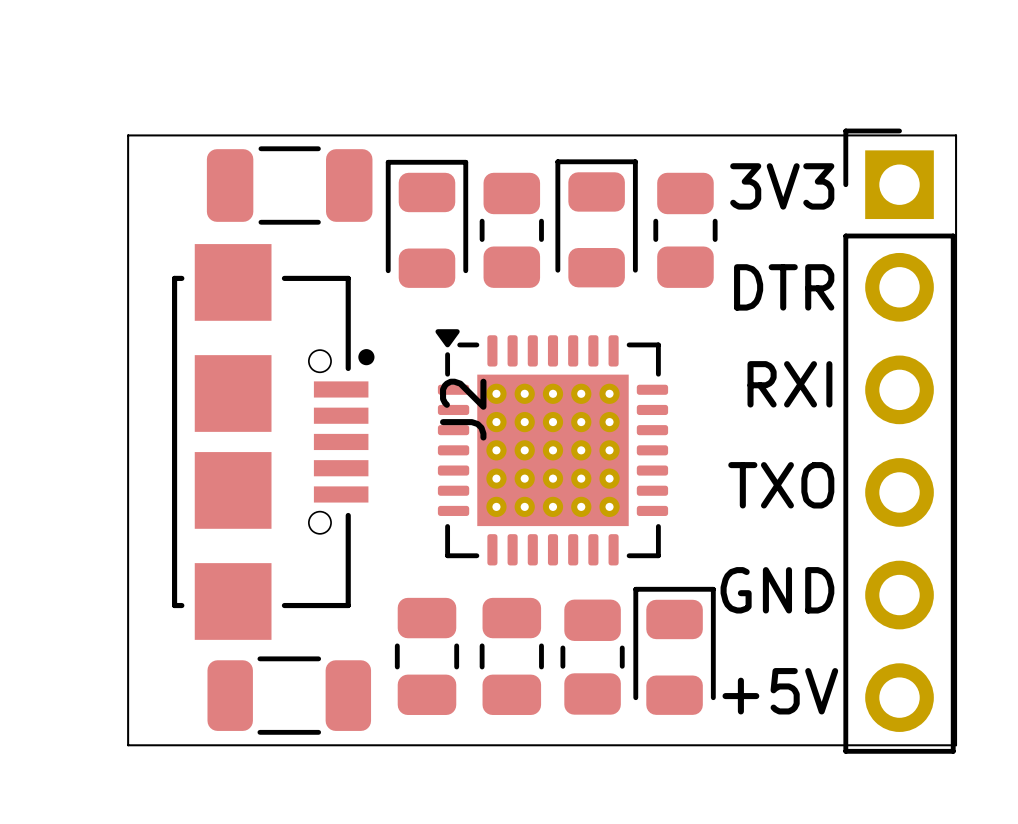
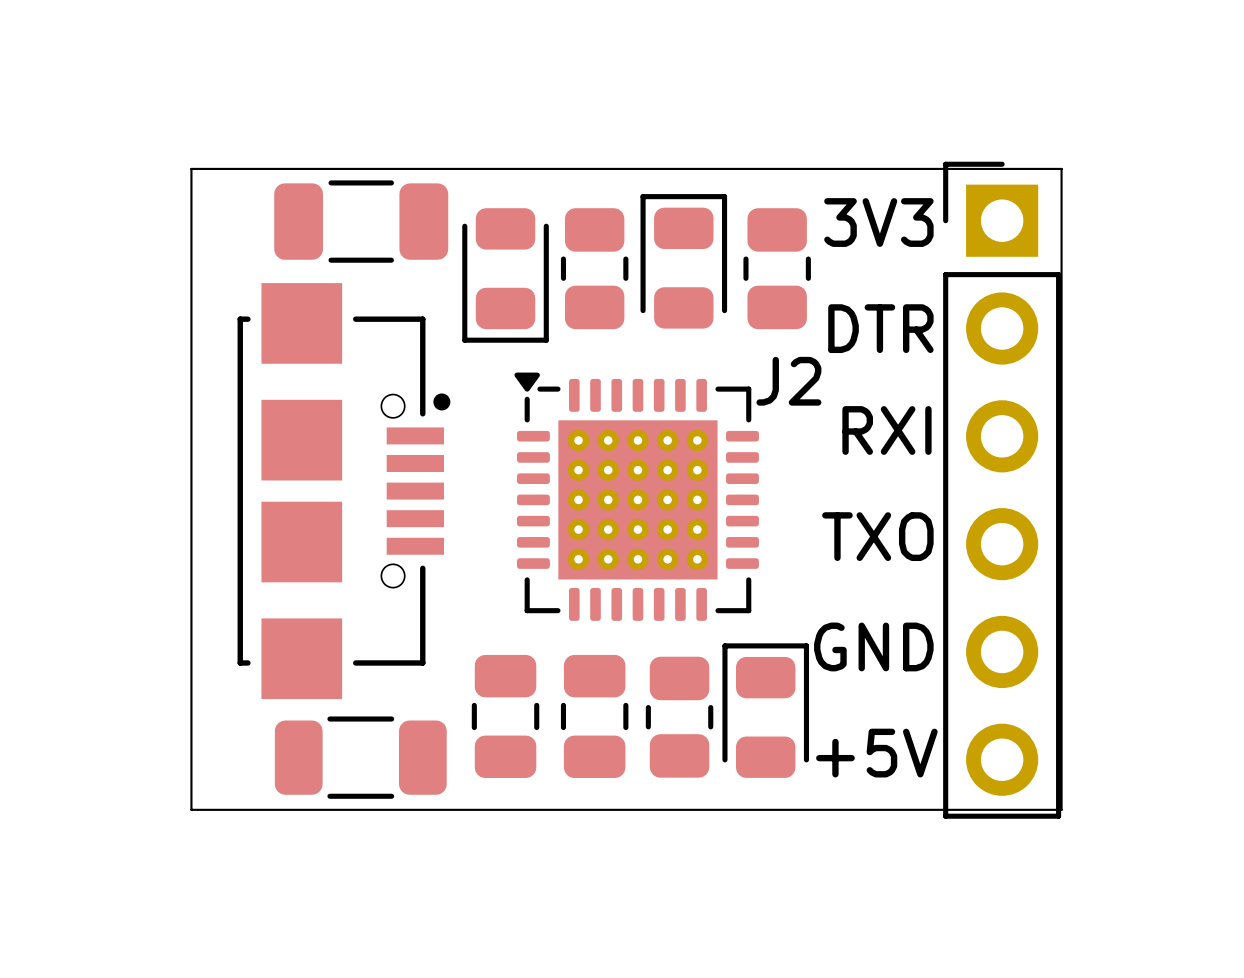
part rotation: 0° (426, 223) -> 180° (505, 275)
J2 name rotation: 0° (463, 409) -> 90° clockwise (788, 381)
J2 name position: J2 (463, 409) -> J2 (788, 381)

